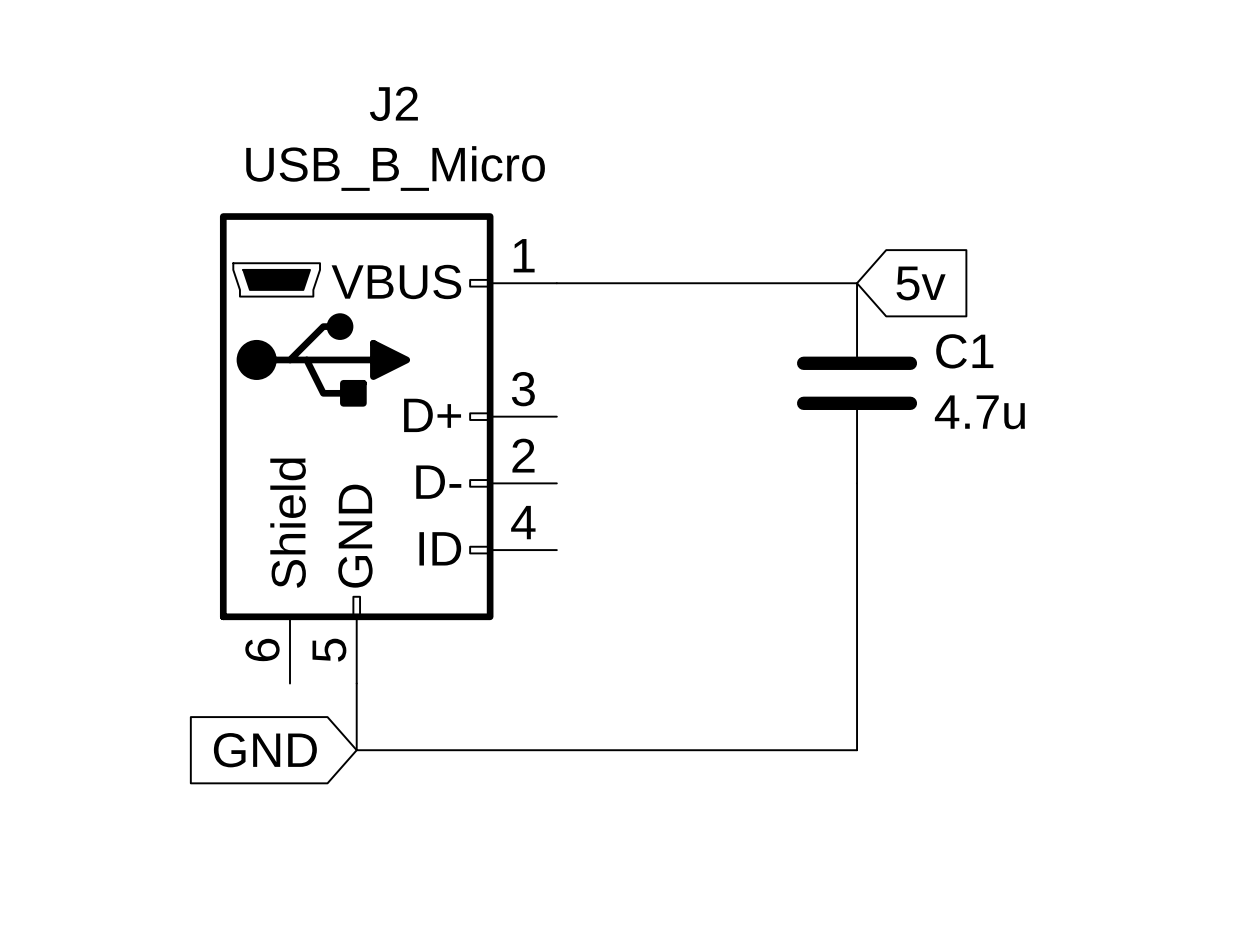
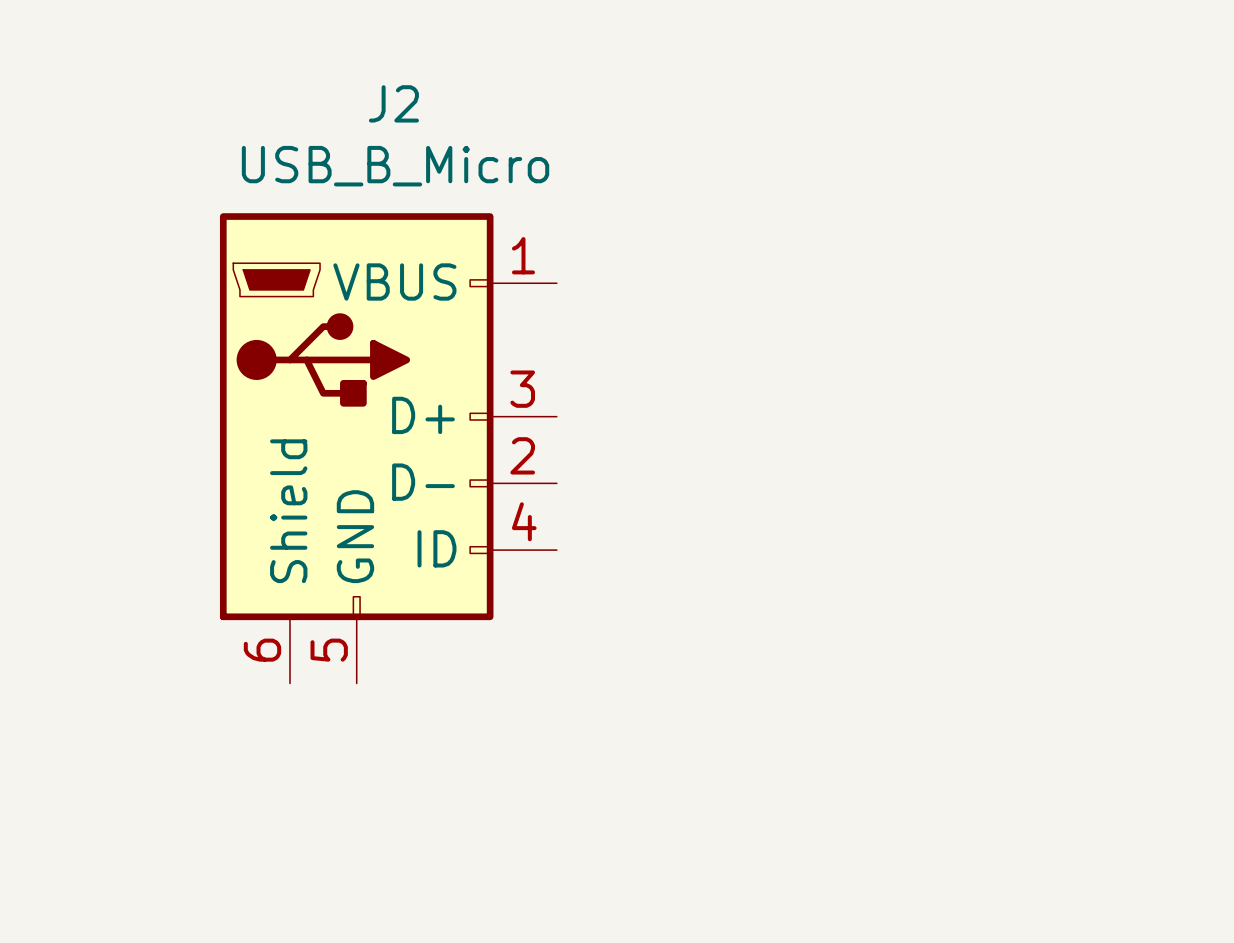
wire: (556, 283) (857, 283) -> none
global label: 5v (921, 283) -> none
C1: 4.7u (857, 383) -> none
wire: (857, 483) (857, 750) (356, 750) (356, 683) -> none
global label: GND (265, 750) -> none

